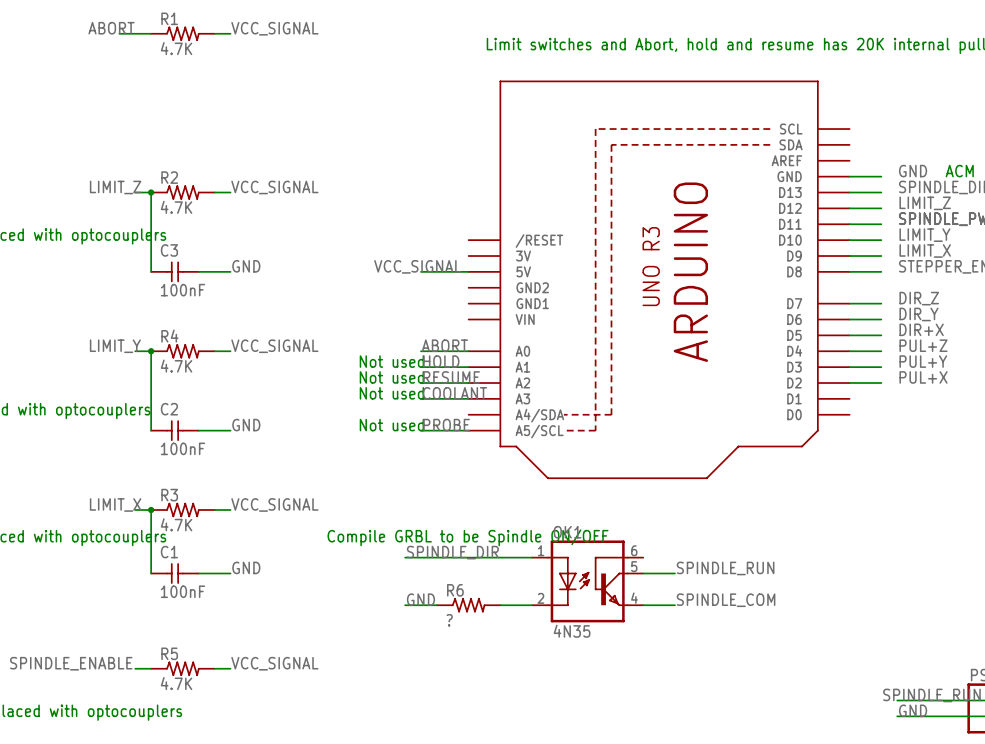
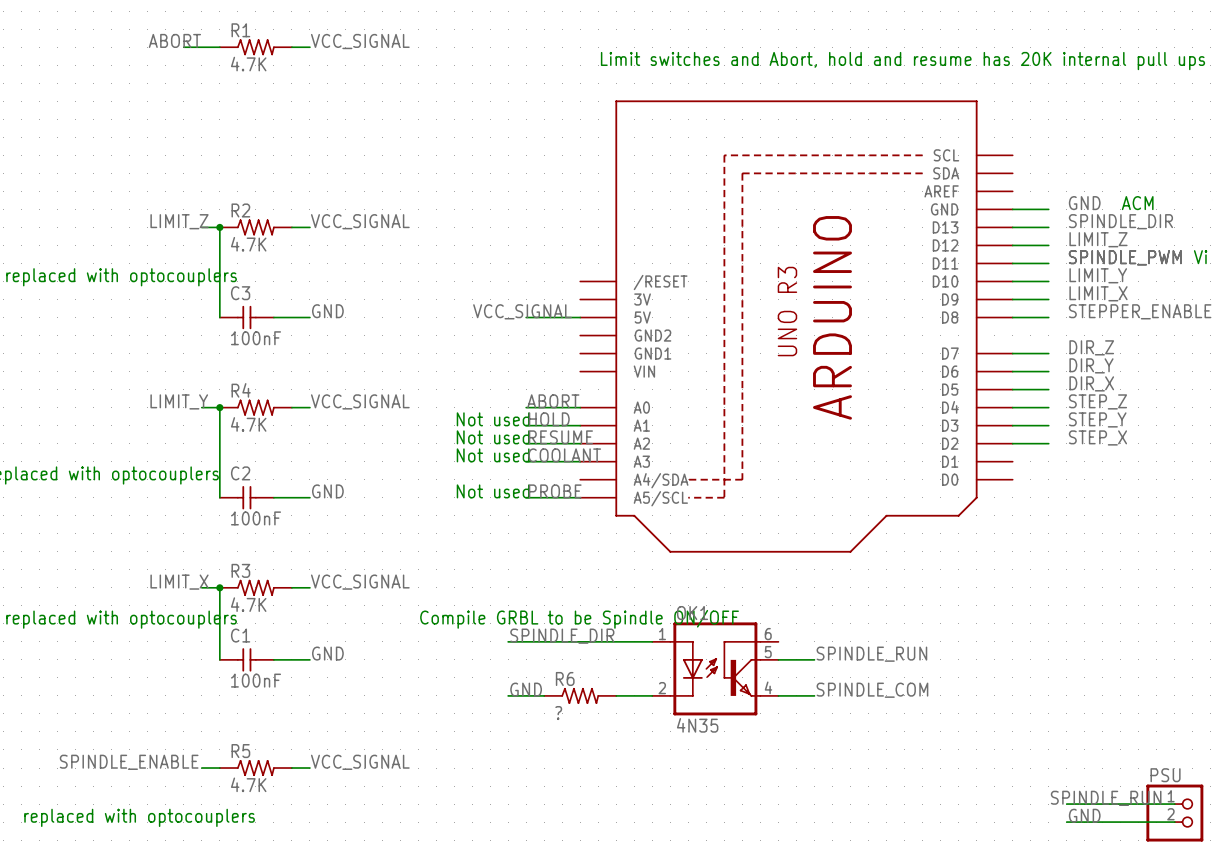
label: DIR+X (921, 329) -> DIR_X (1091, 383)
label: PUL+Z (923, 345) -> STEP_Z (1097, 401)
label: PUL+Y (923, 361) -> STEP_Y (1097, 419)
label: PUL+X (923, 377) -> STEP_X (1097, 437)

